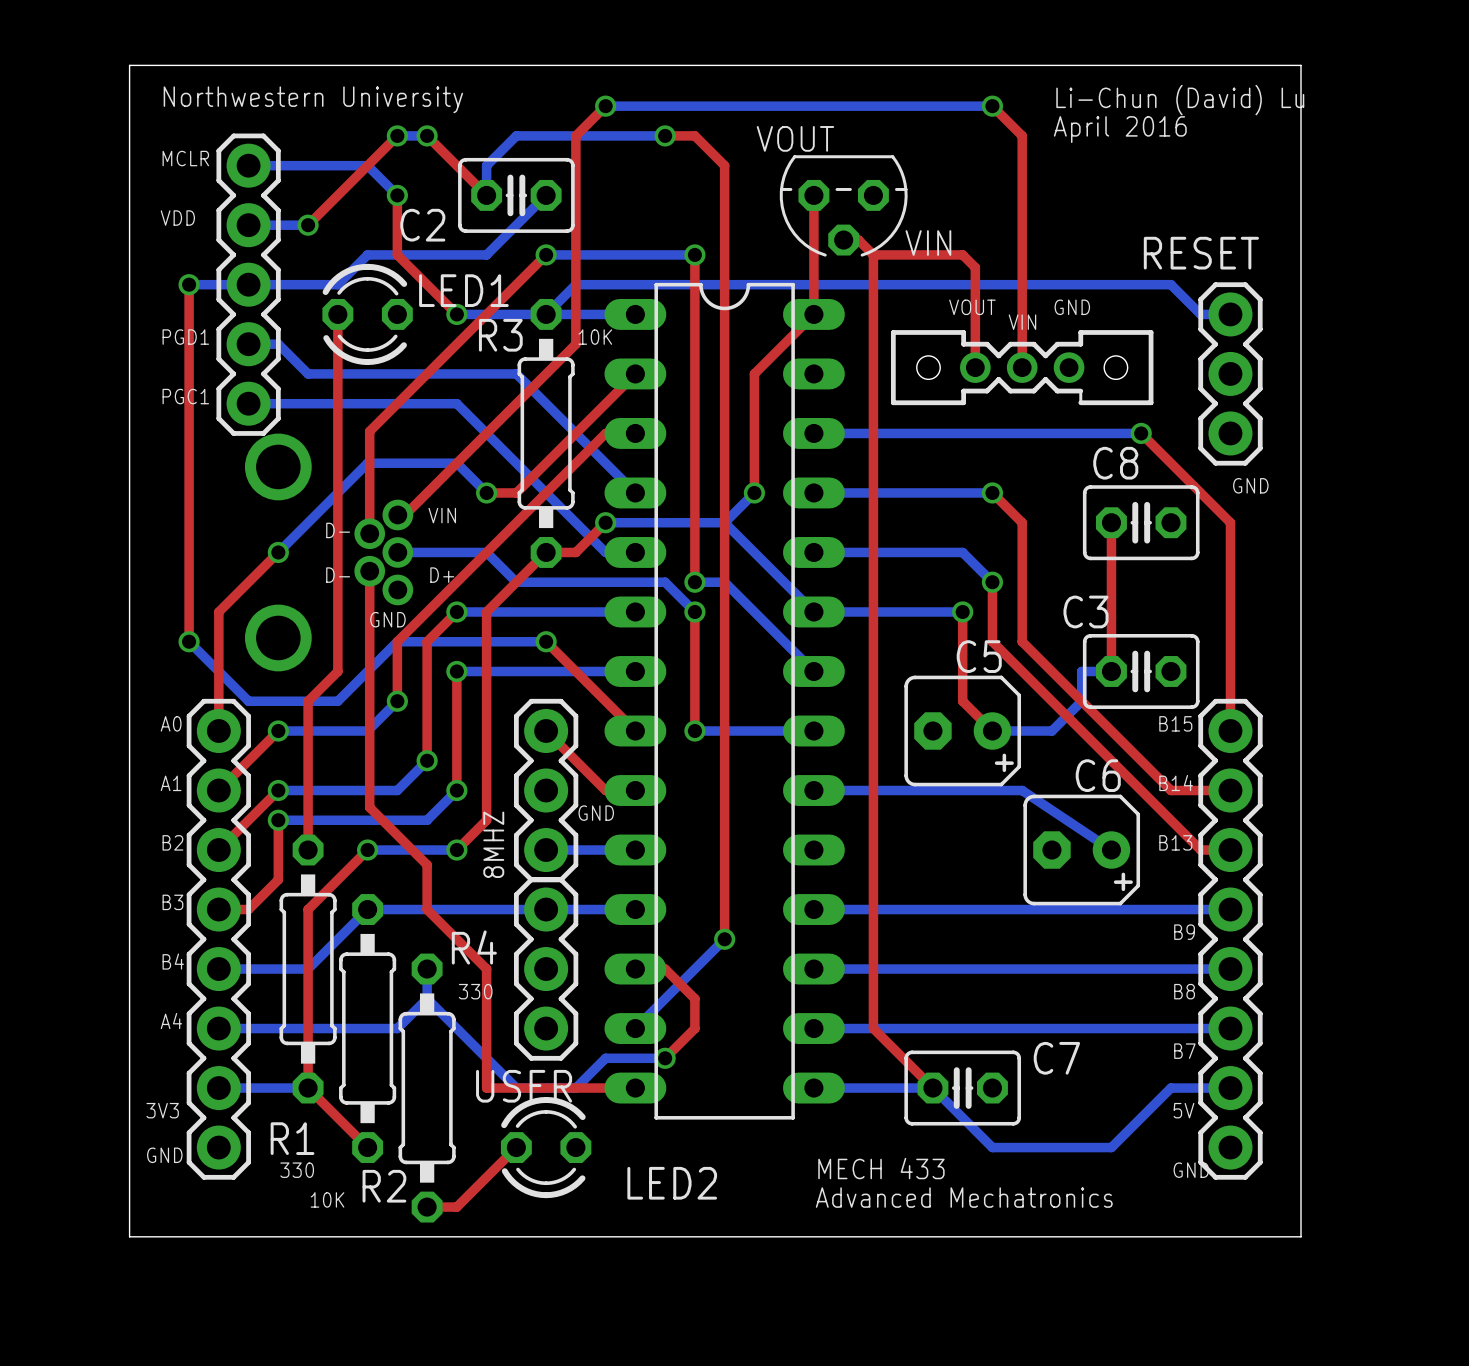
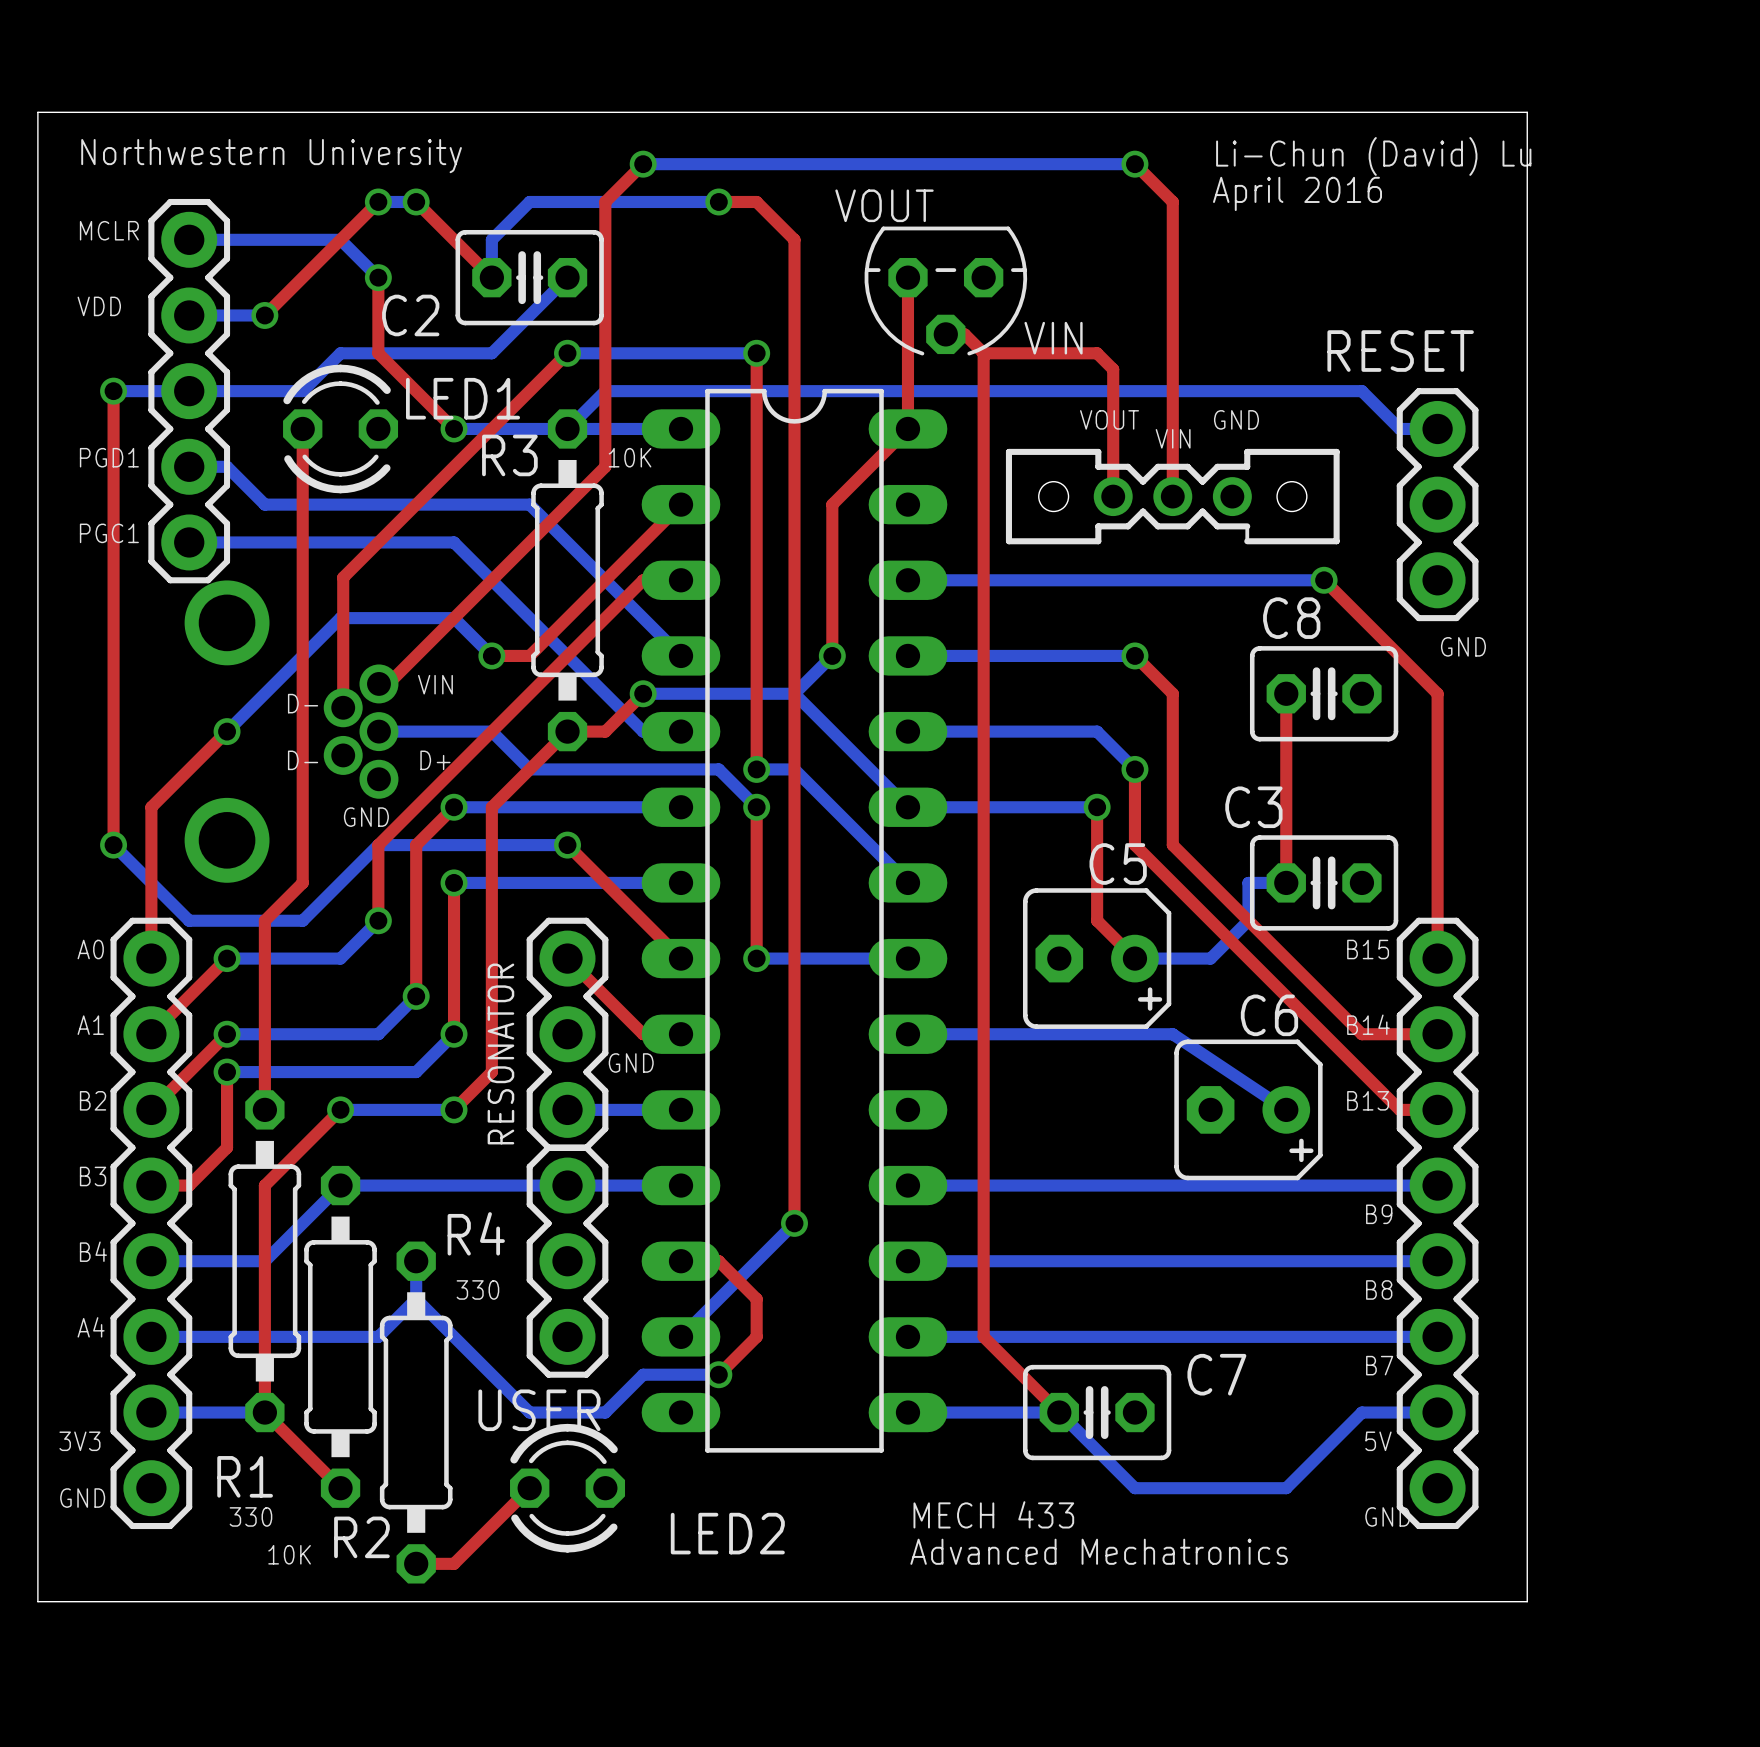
top track: (369, 571) (369, 807) (427, 864) (427, 909) (486, 969) (486, 1088) (635, 1088) -> none
8MHZ name: 8MHZ (493, 844) -> RESONATOR (500, 1053)

